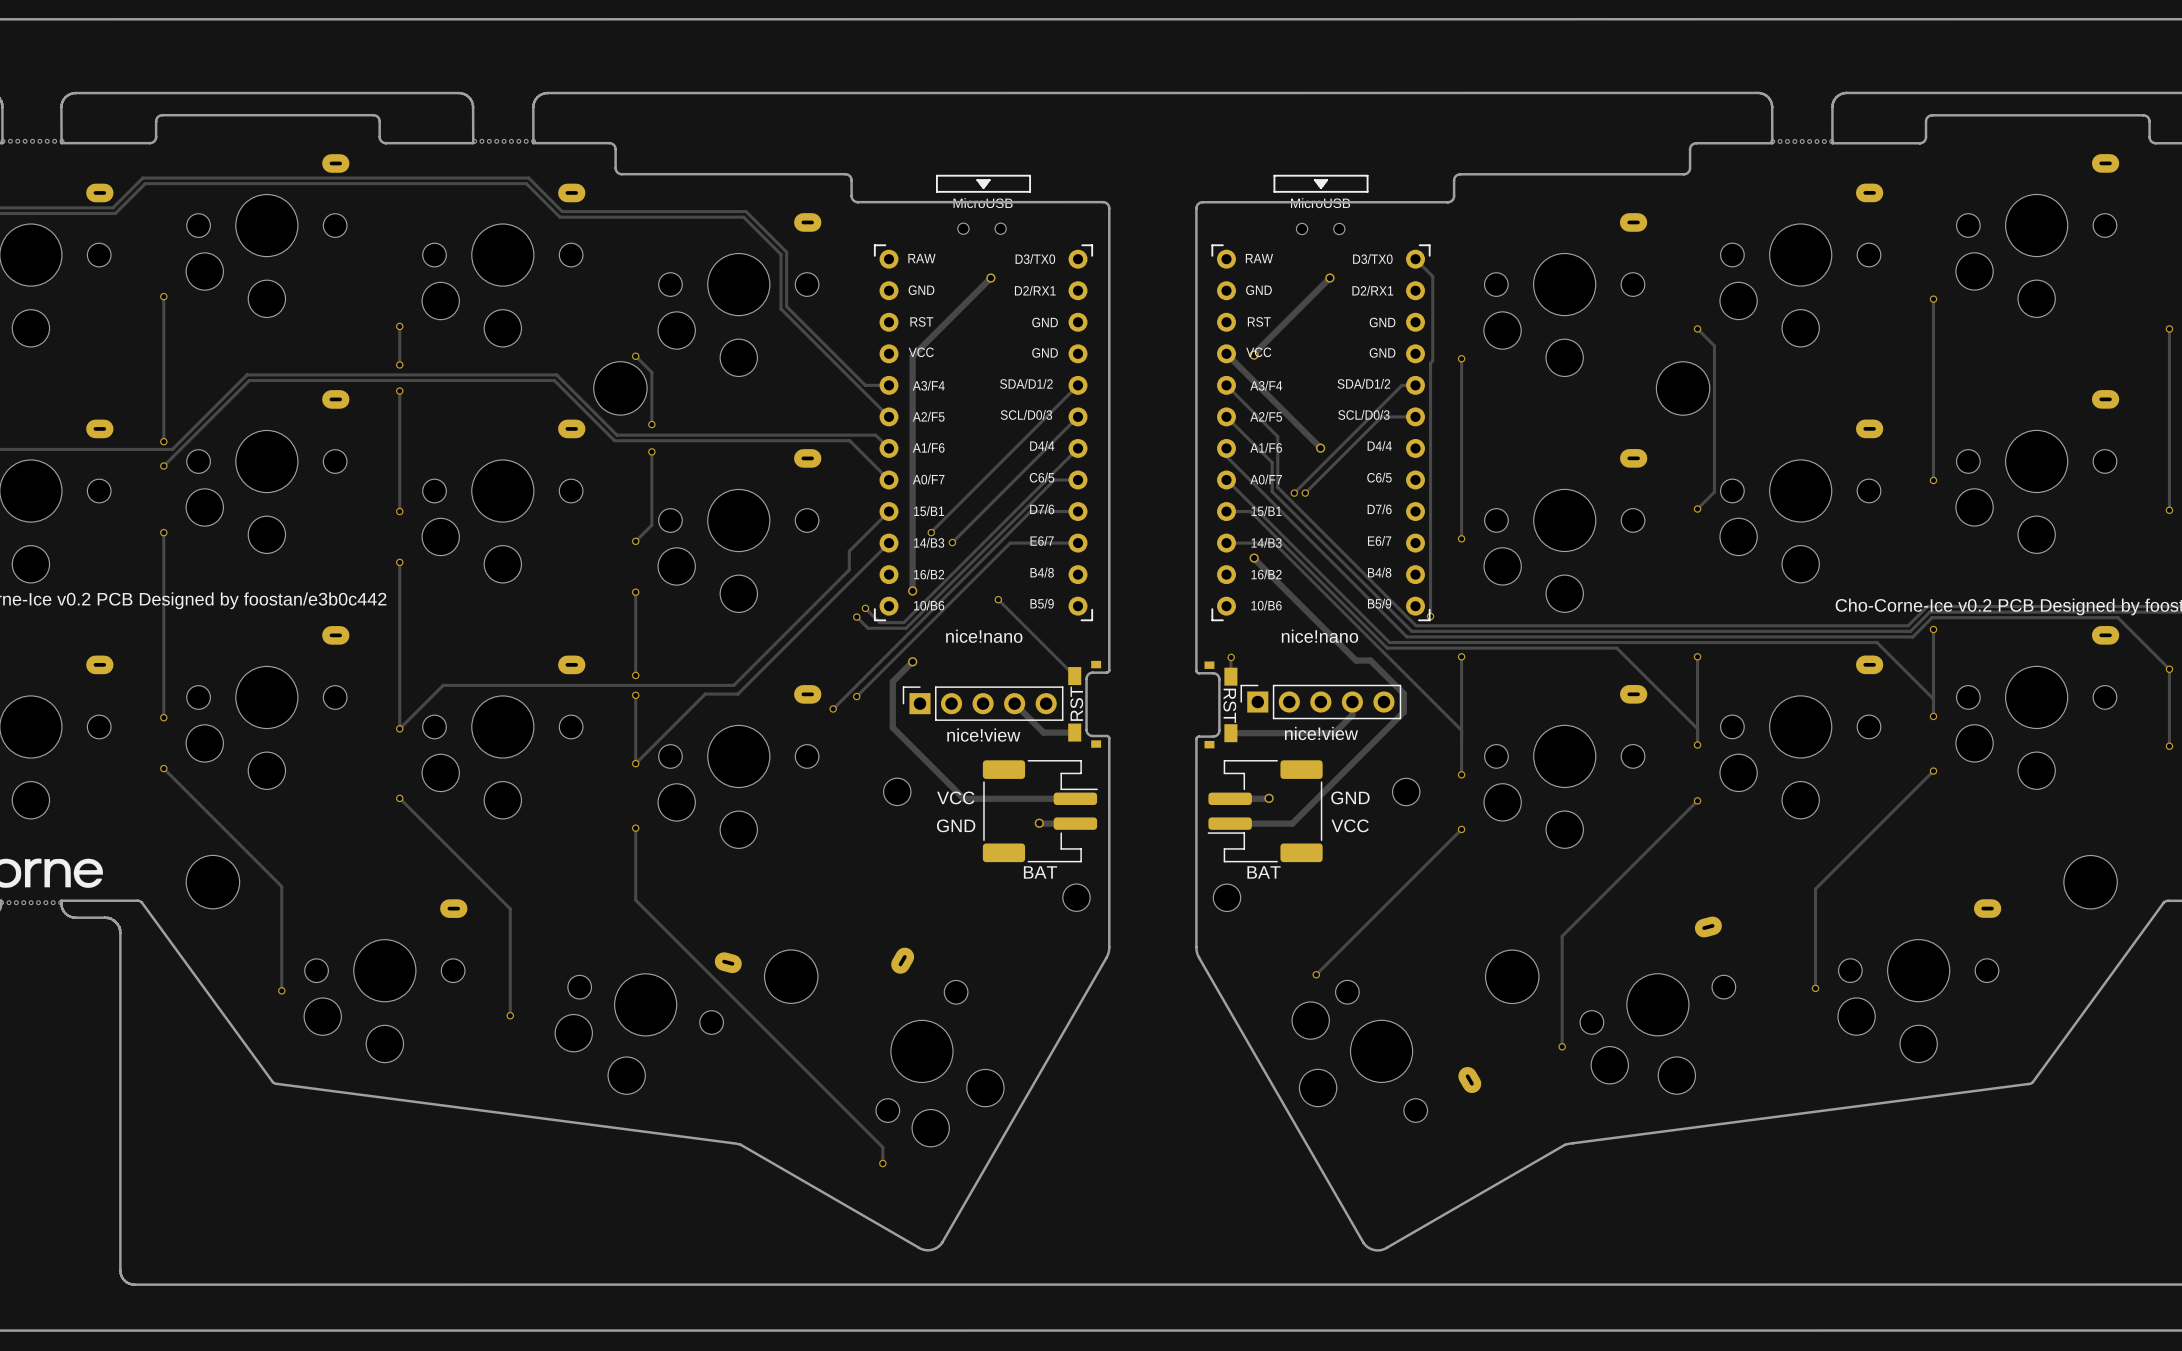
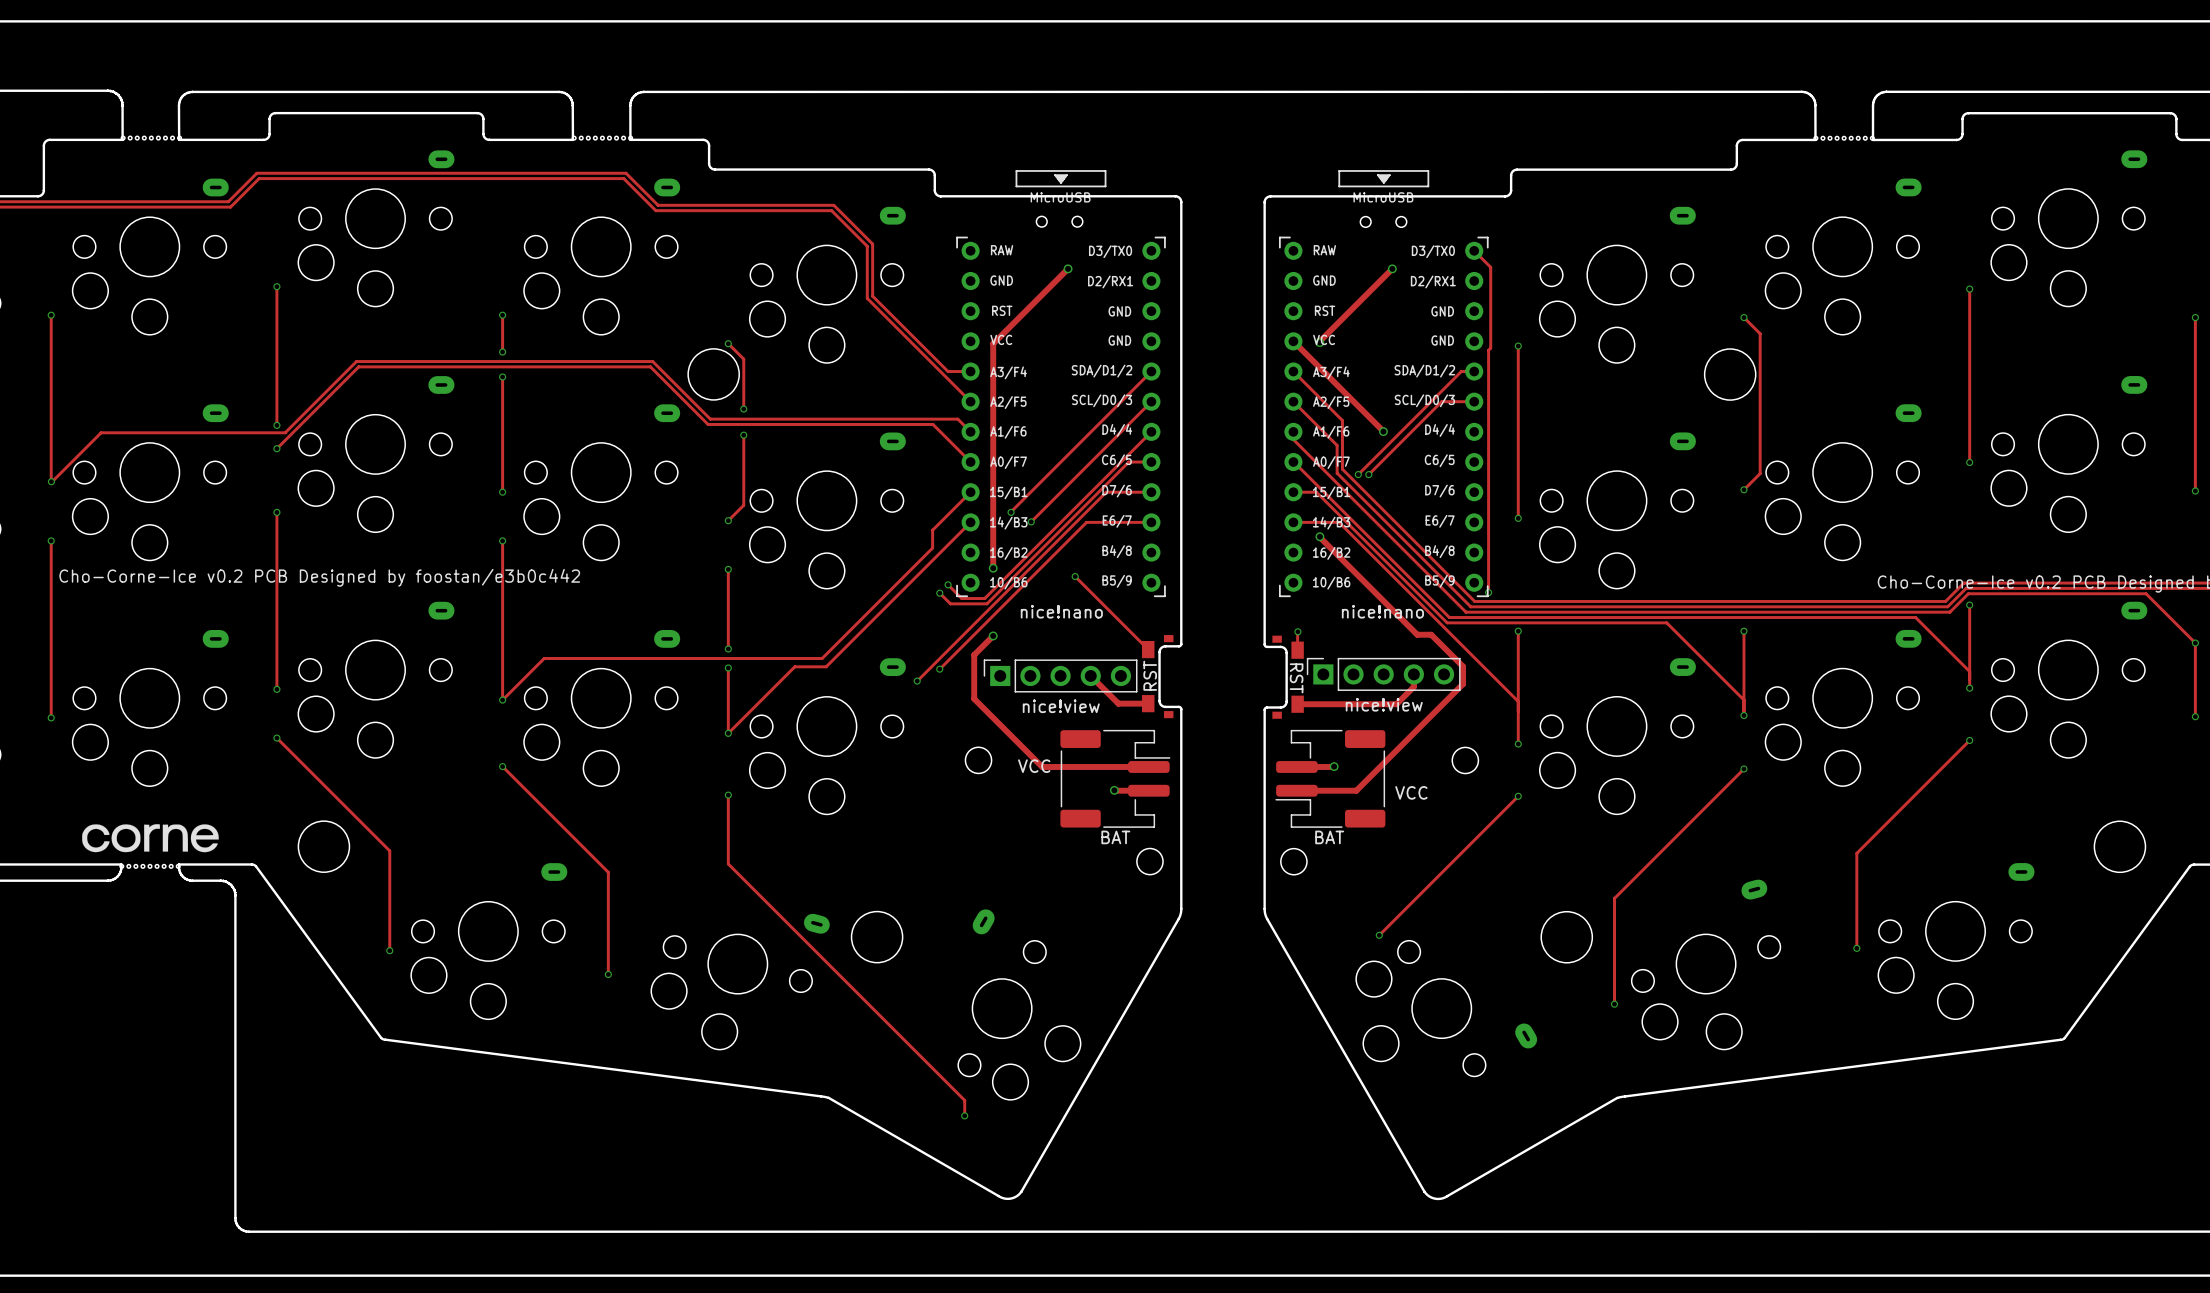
text: GND (1350, 797) -> none
text: GND (956, 825) -> none

